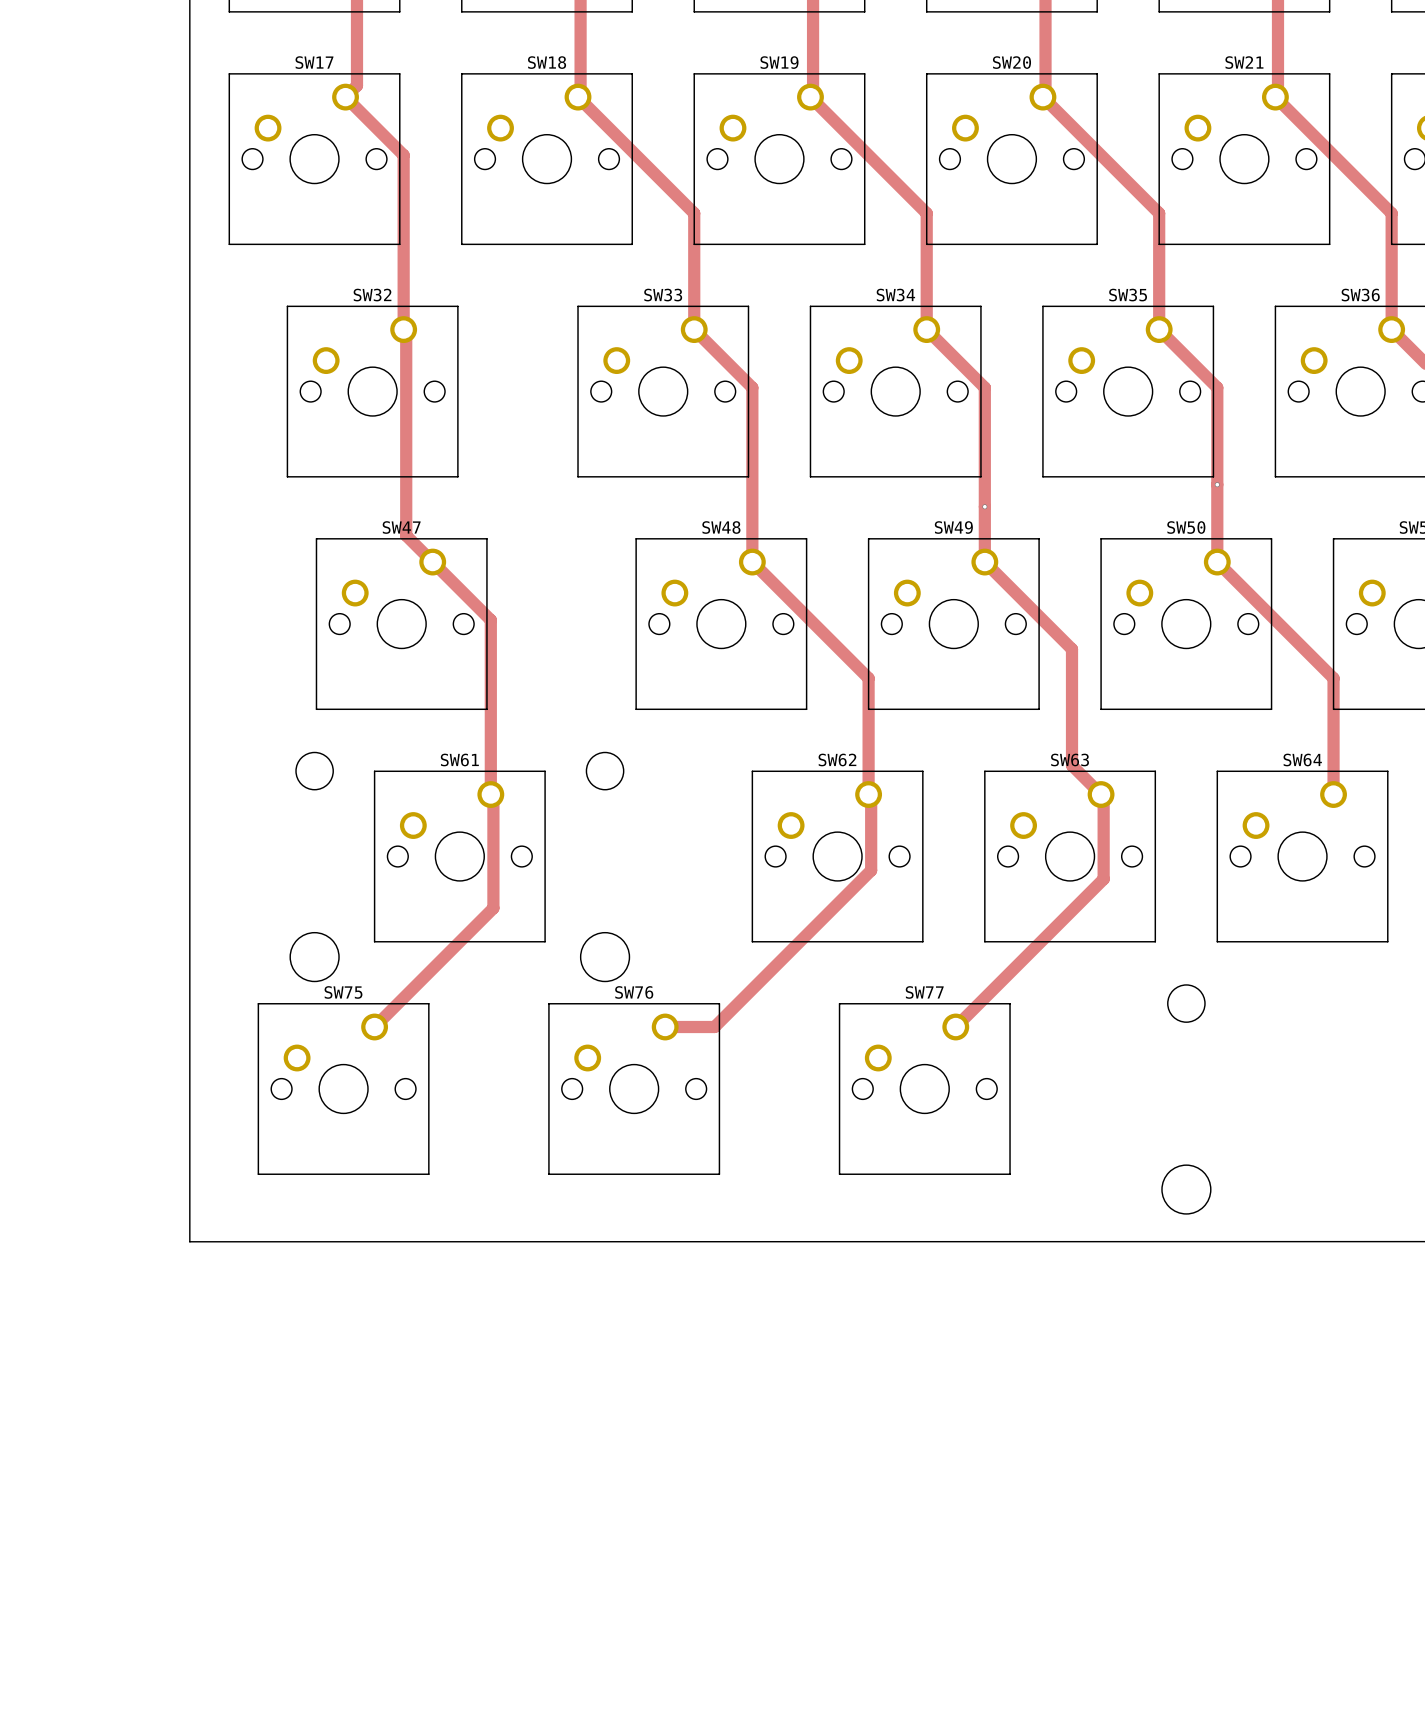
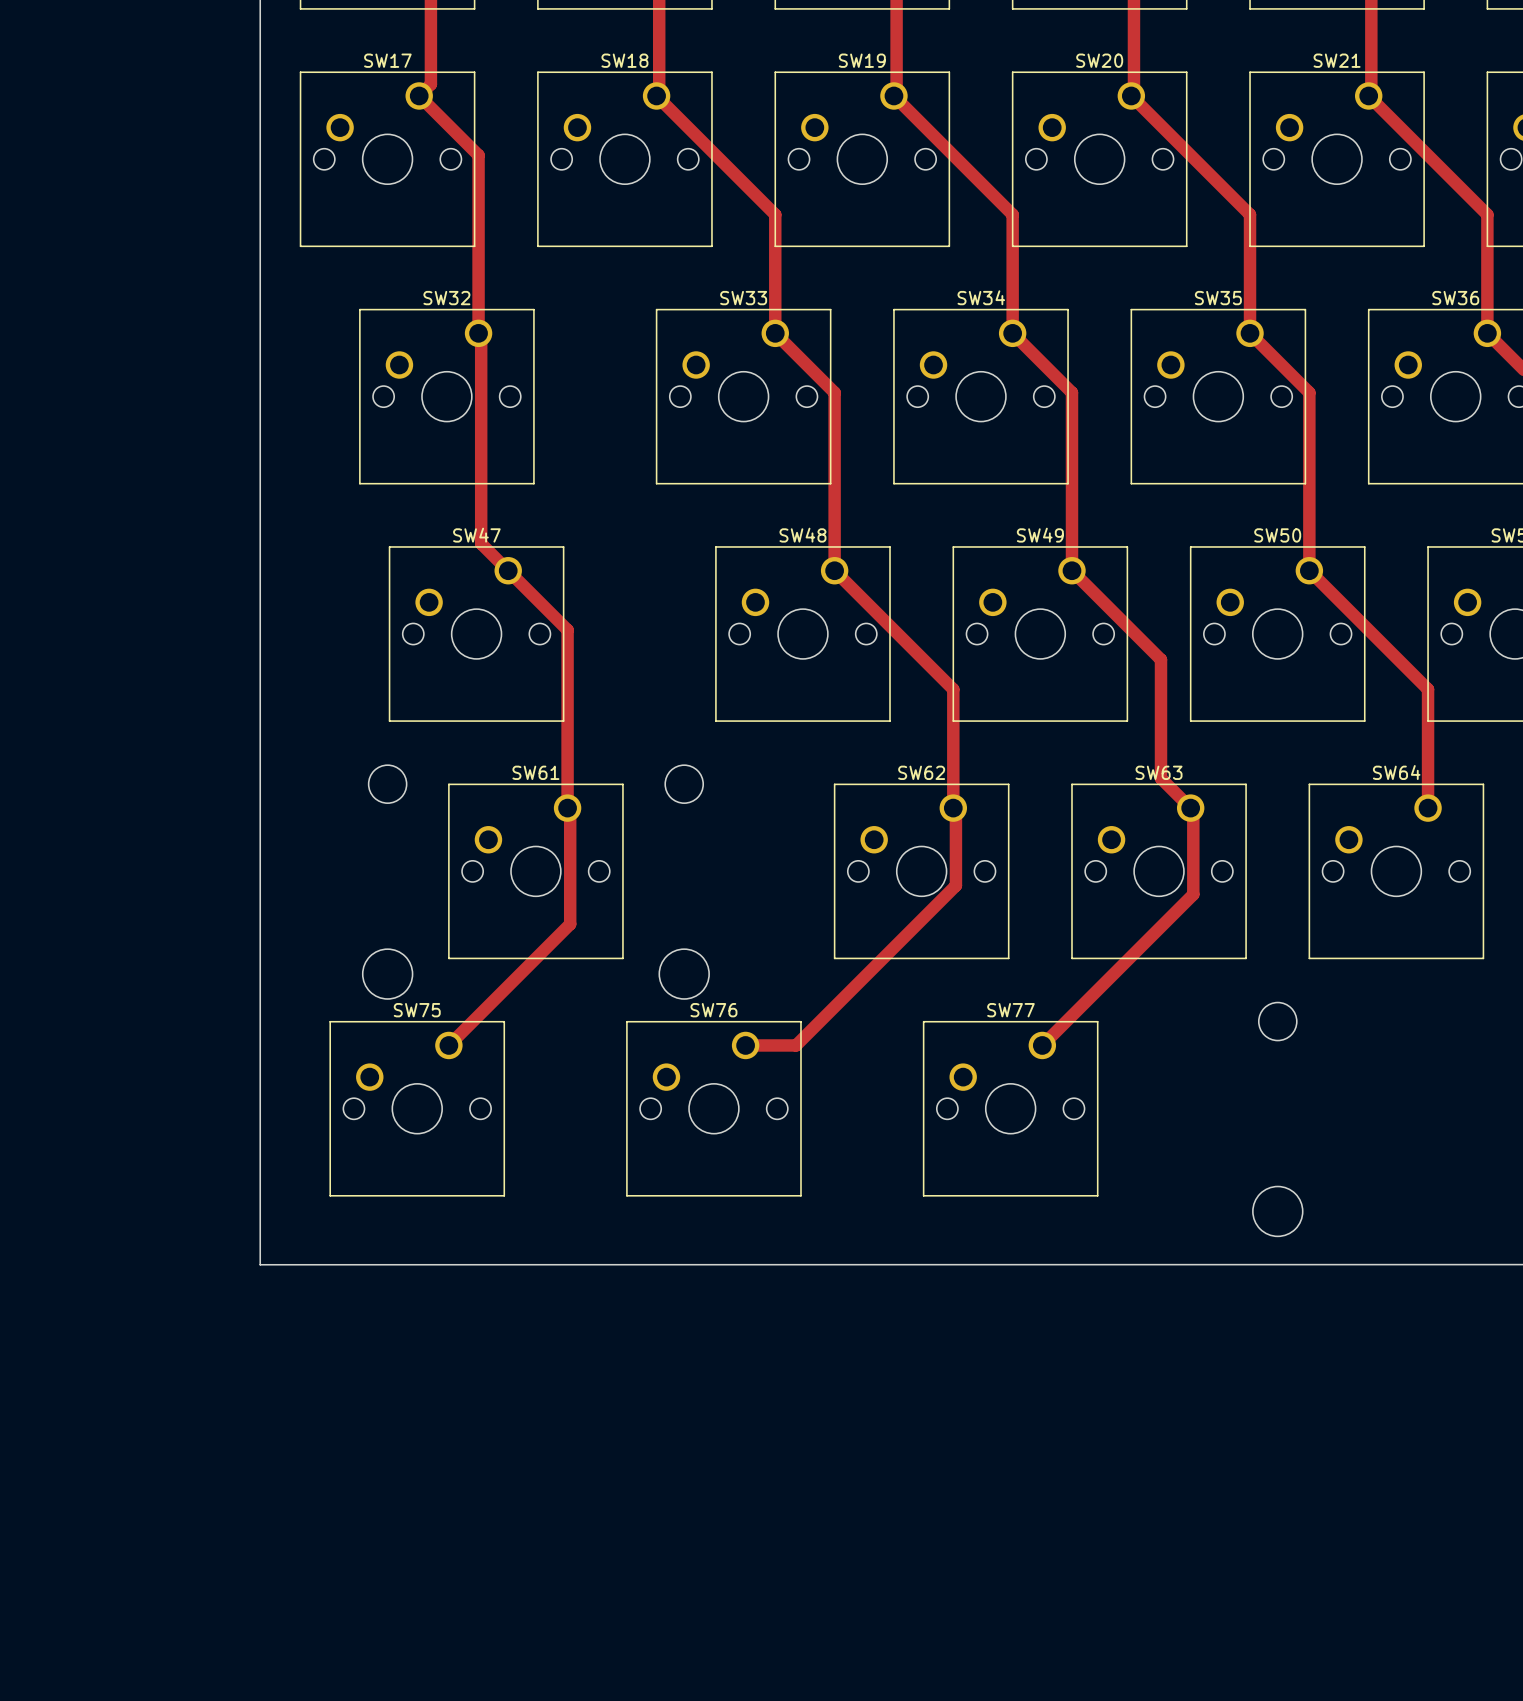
via: (1217, 484) -> none
via: (984, 506) -> none

